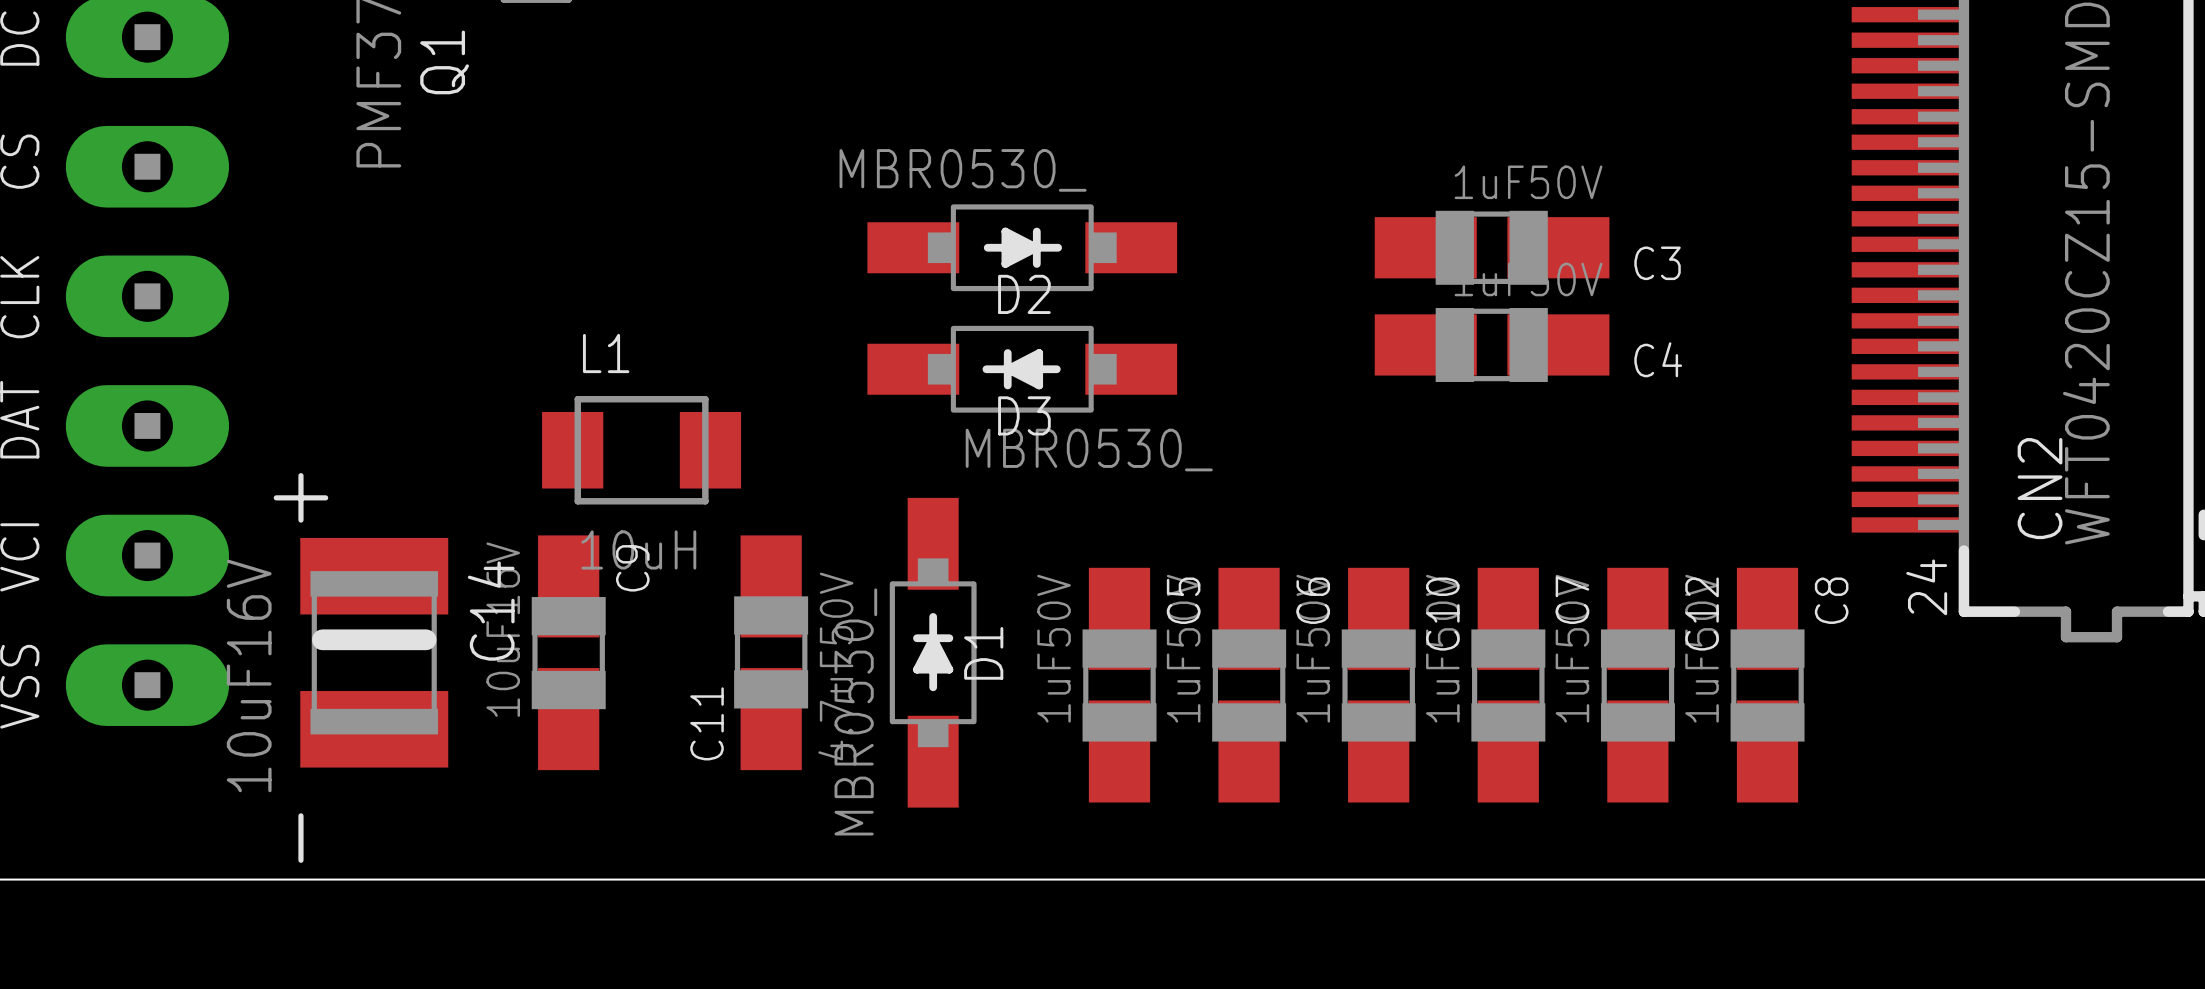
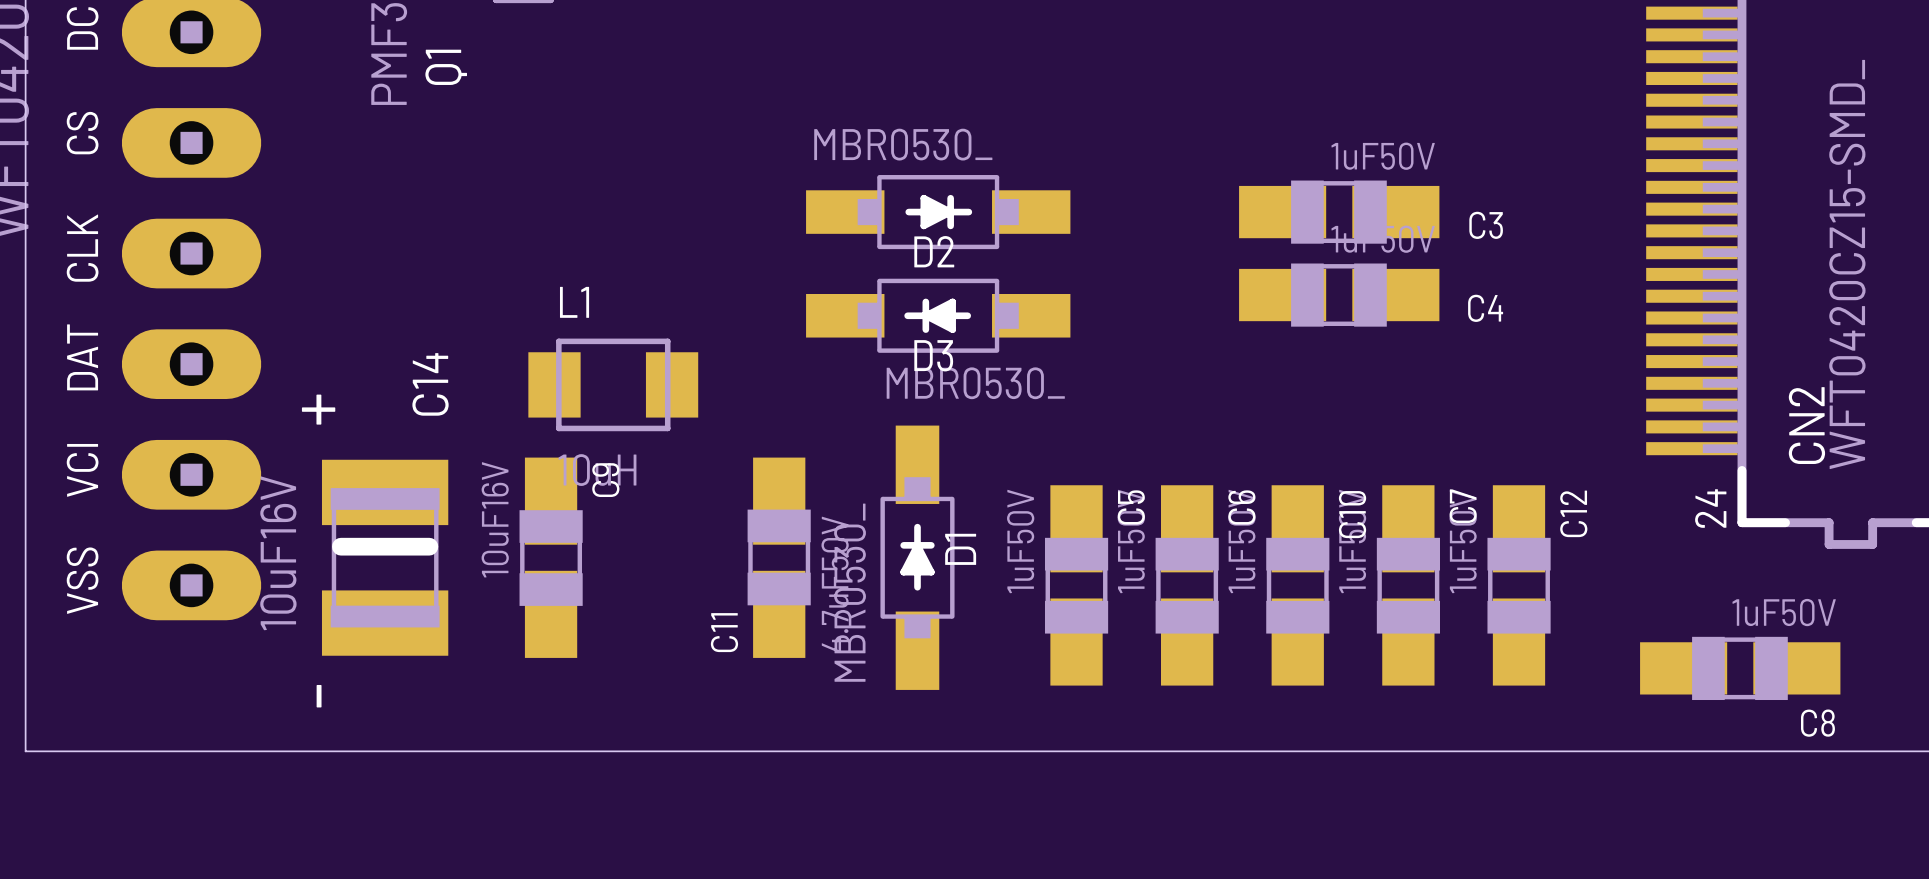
C14 name position: C14 (491, 611) -> C14 (430, 384)
C11 position: (771, 652) -> (779, 557)
D1 position: (933, 652) -> (917, 557)
C5 position: (1119, 685) -> (1076, 585)
C6 position: (1249, 685) -> (1187, 585)
C10 position: (1378, 685) -> (1297, 585)
C7 position: (1508, 685) -> (1408, 585)
C12 position: (1637, 685) -> (1519, 585)
C8 rotation: 0° (1767, 685) -> 90° clockwise (1740, 668)
C8 position: (1767, 685) -> (1740, 668)

